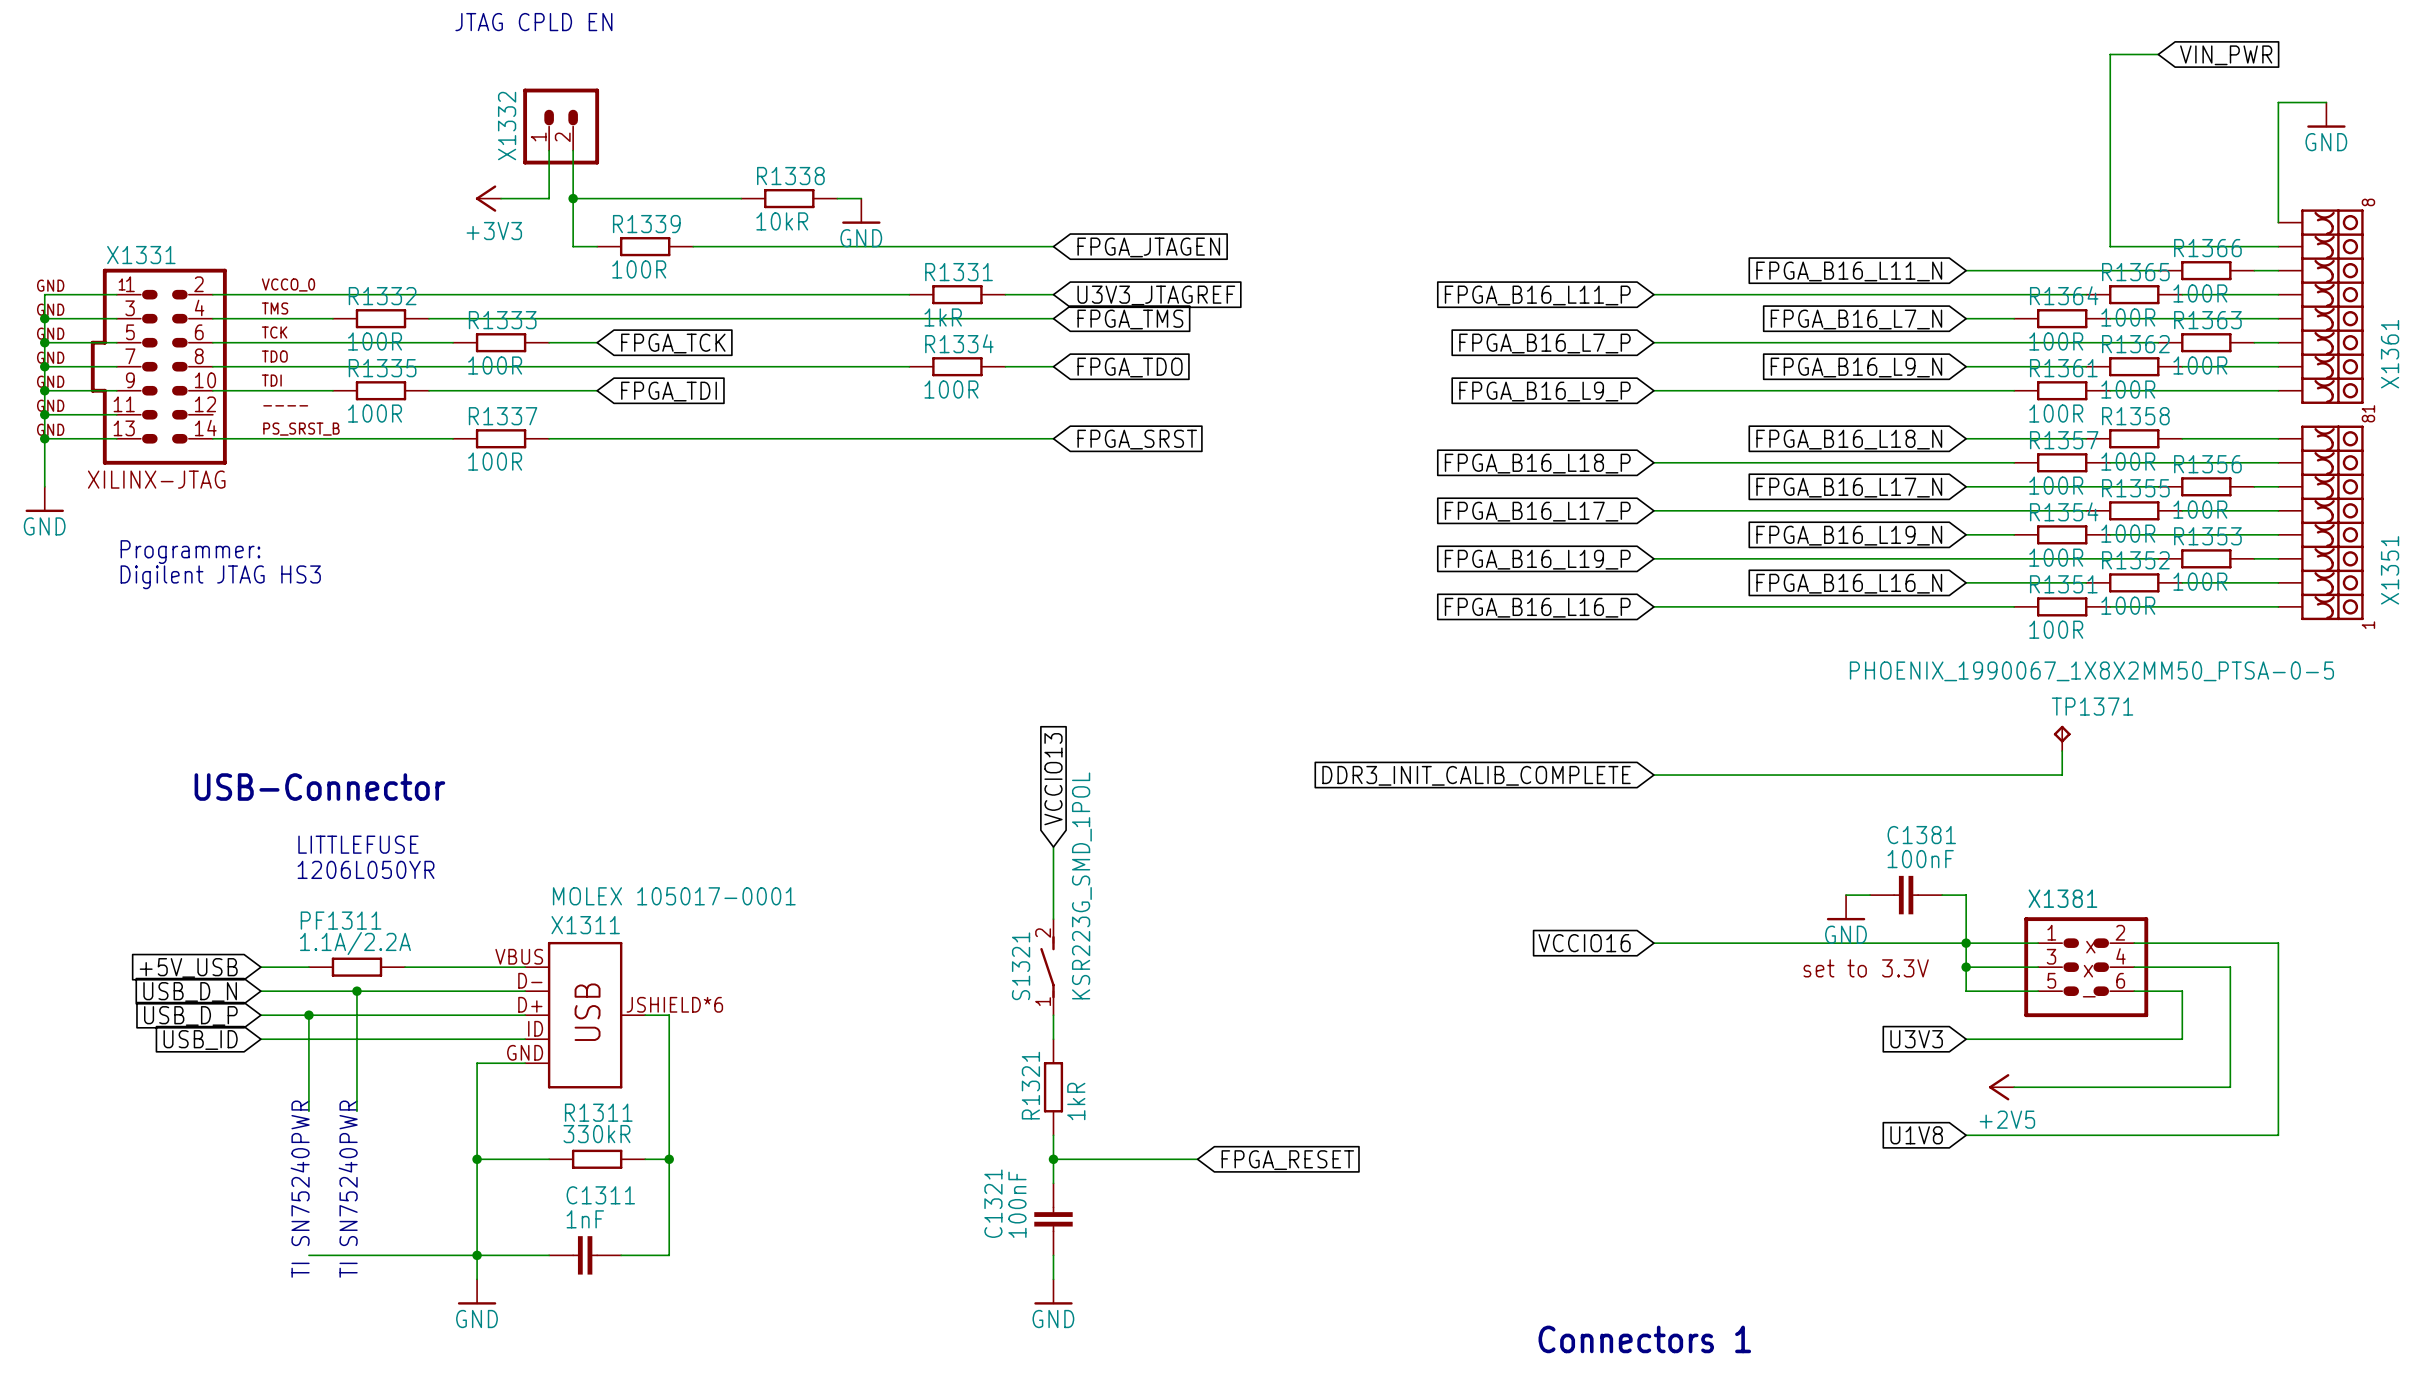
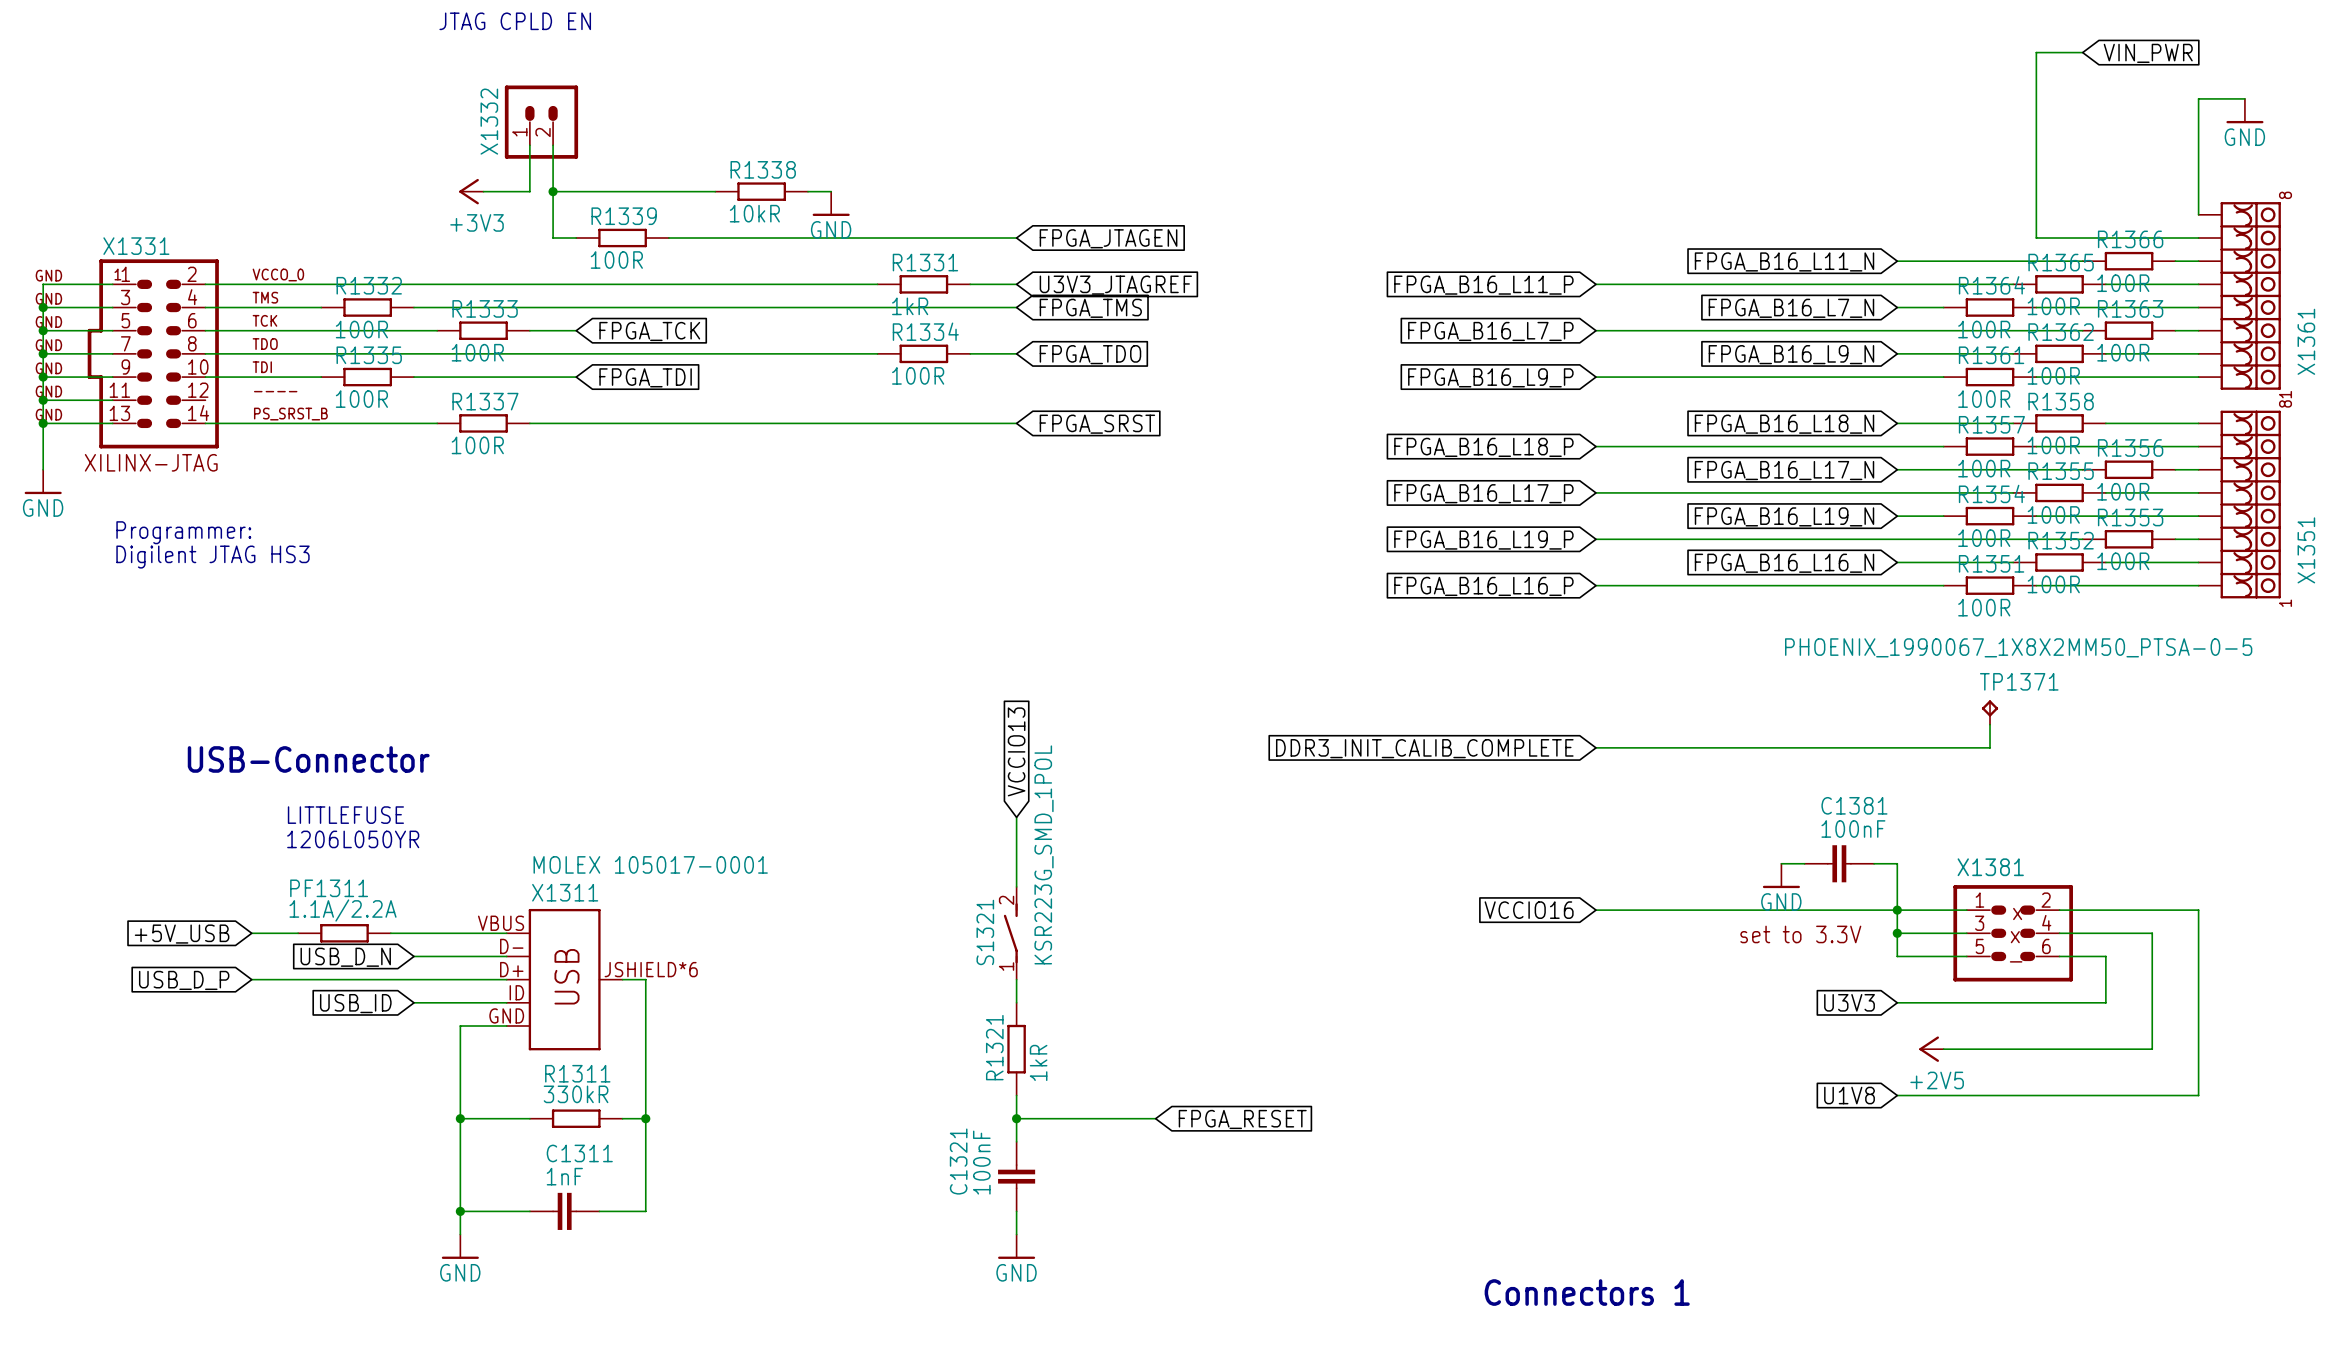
global label position: USB_D_N (190, 991) -> USB_D_N (345, 957)
wire: (260, 991) (429, 991) -> none
wire: (356, 991) (356, 1111) -> none
junction: (356, 991) -> none
wire: (308, 1015) (308, 1111) -> none
junction: (308, 1015) -> none
wire: (260, 1039) (429, 1039) -> none
global label position: USB_ID (200, 1040) -> USB_ID (355, 1003)
text: TI SN75240PWR (300, 1189) -> none
text: TI SN75240PWR (348, 1189) -> none
wire: (308, 1255) (477, 1255) -> none

